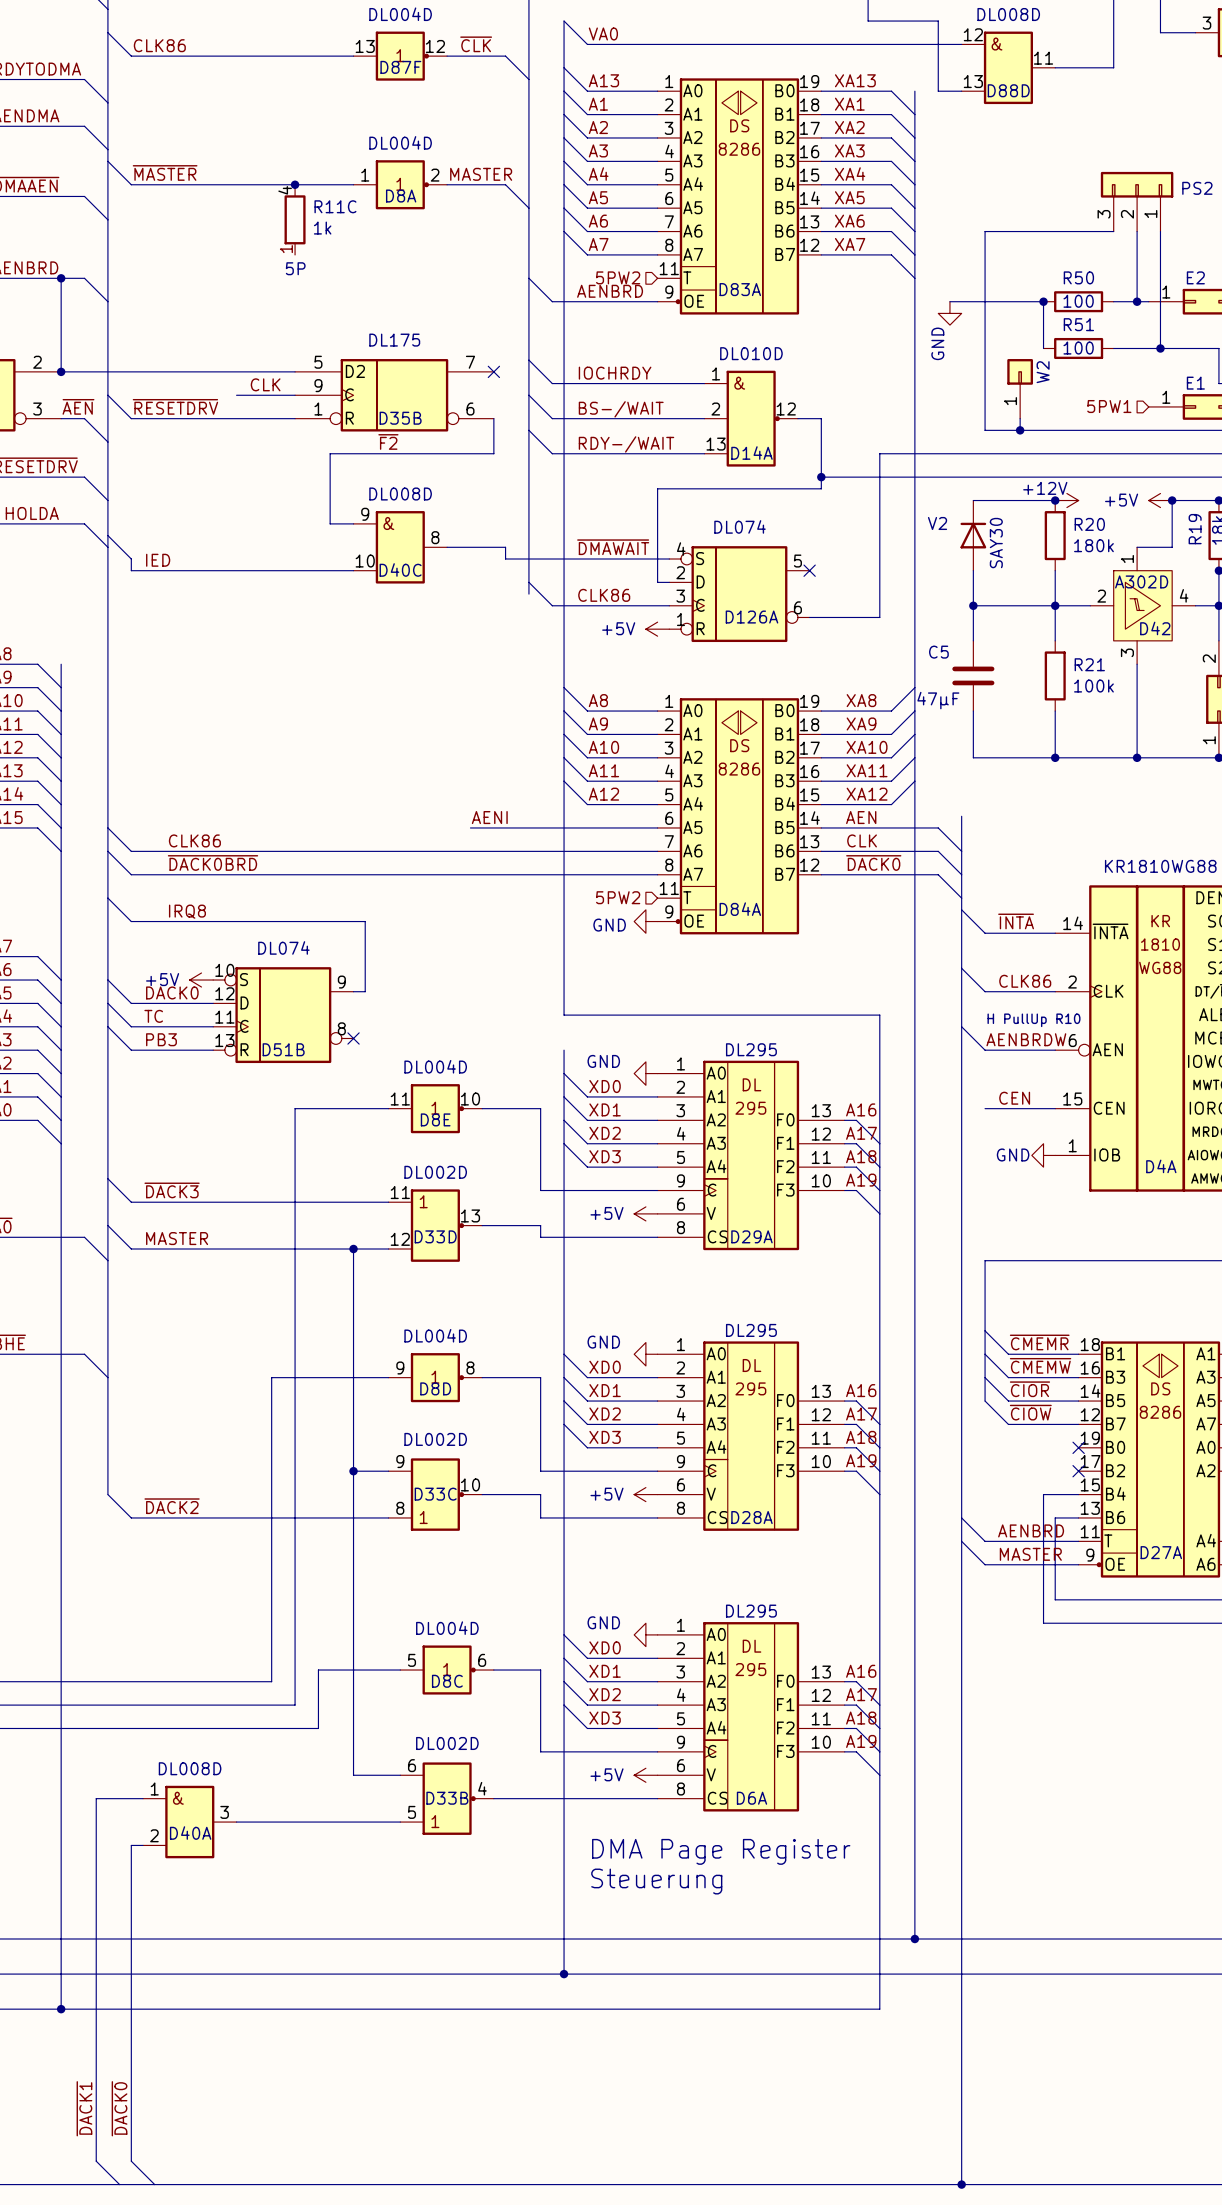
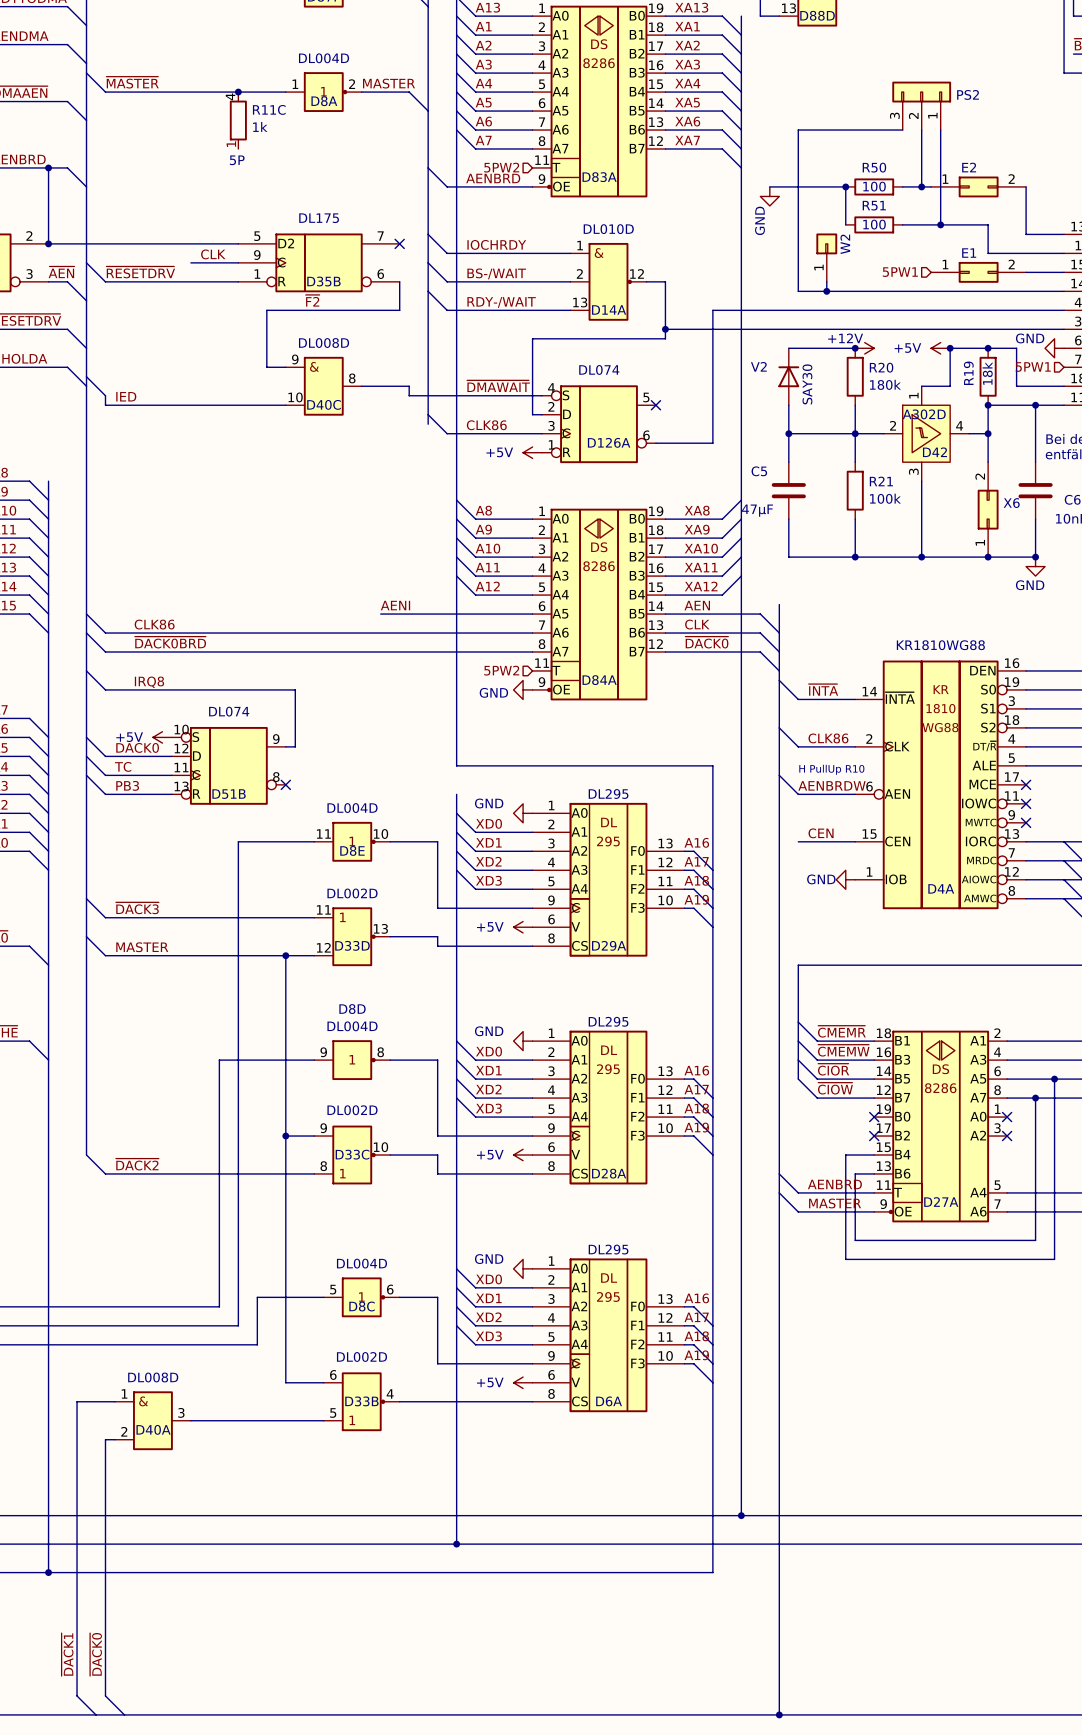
wire: (37, 1237) (84, 1237) (107, 1260) -> (29, 946) (48, 965)
wire: (37, 1354) (84, 1354) (107, 1377) -> (29, 1041) (48, 1060)
D8D name position: D8D (435, 1388) -> D8D (352, 1009)
text: DMA Page Register (721, 1851) -> none
text: Steuerung (656, 1881) -> none

